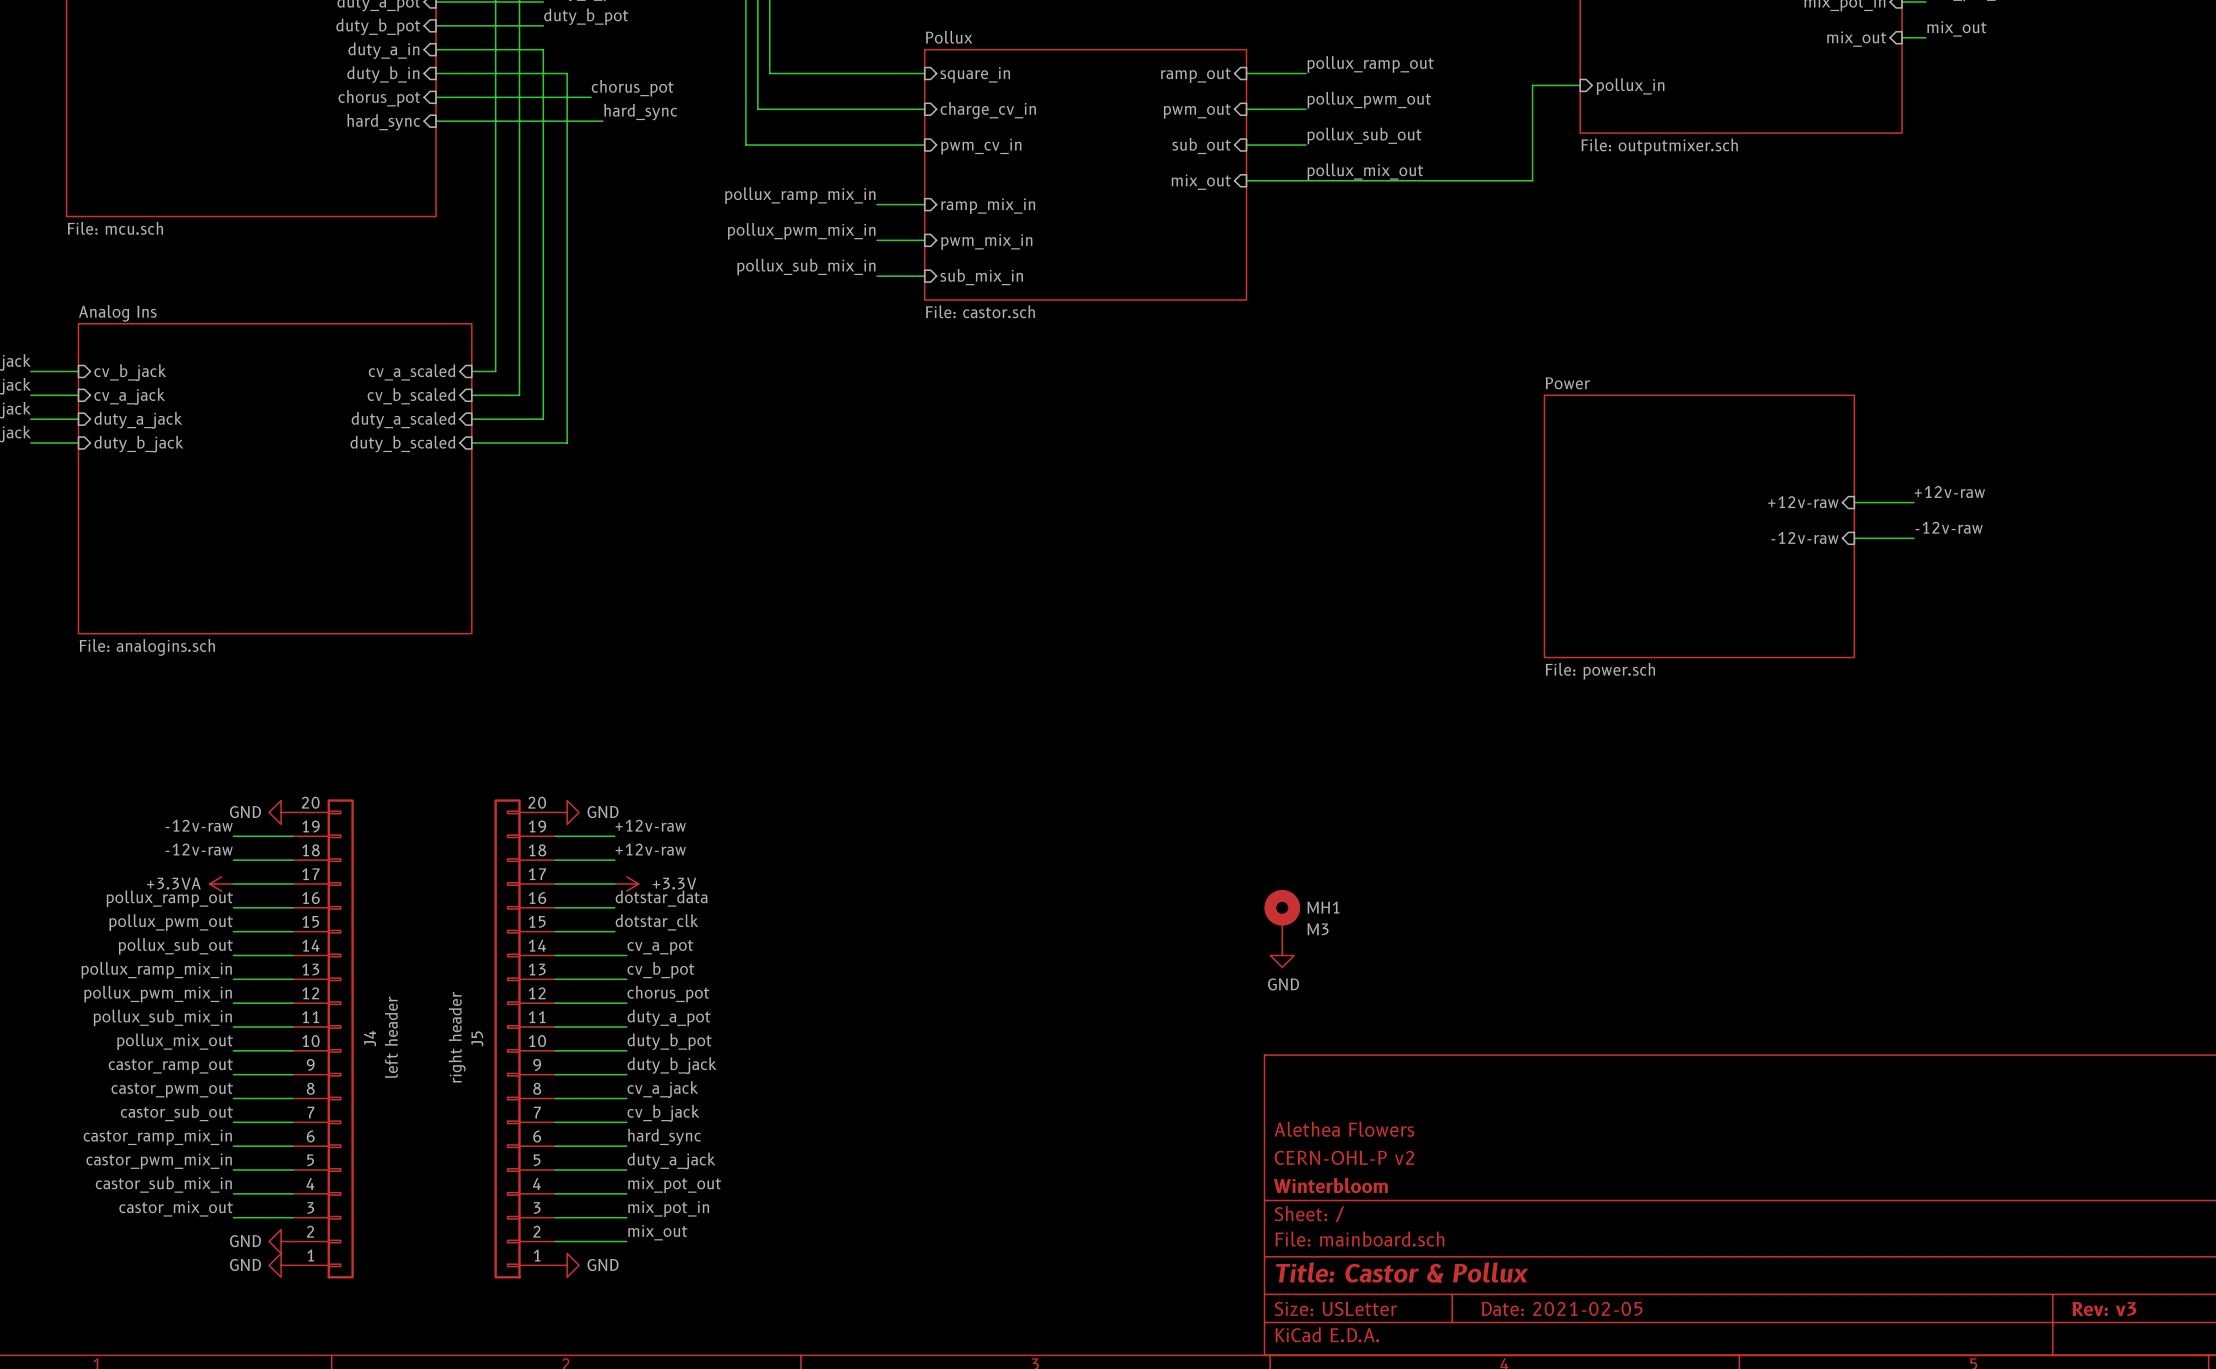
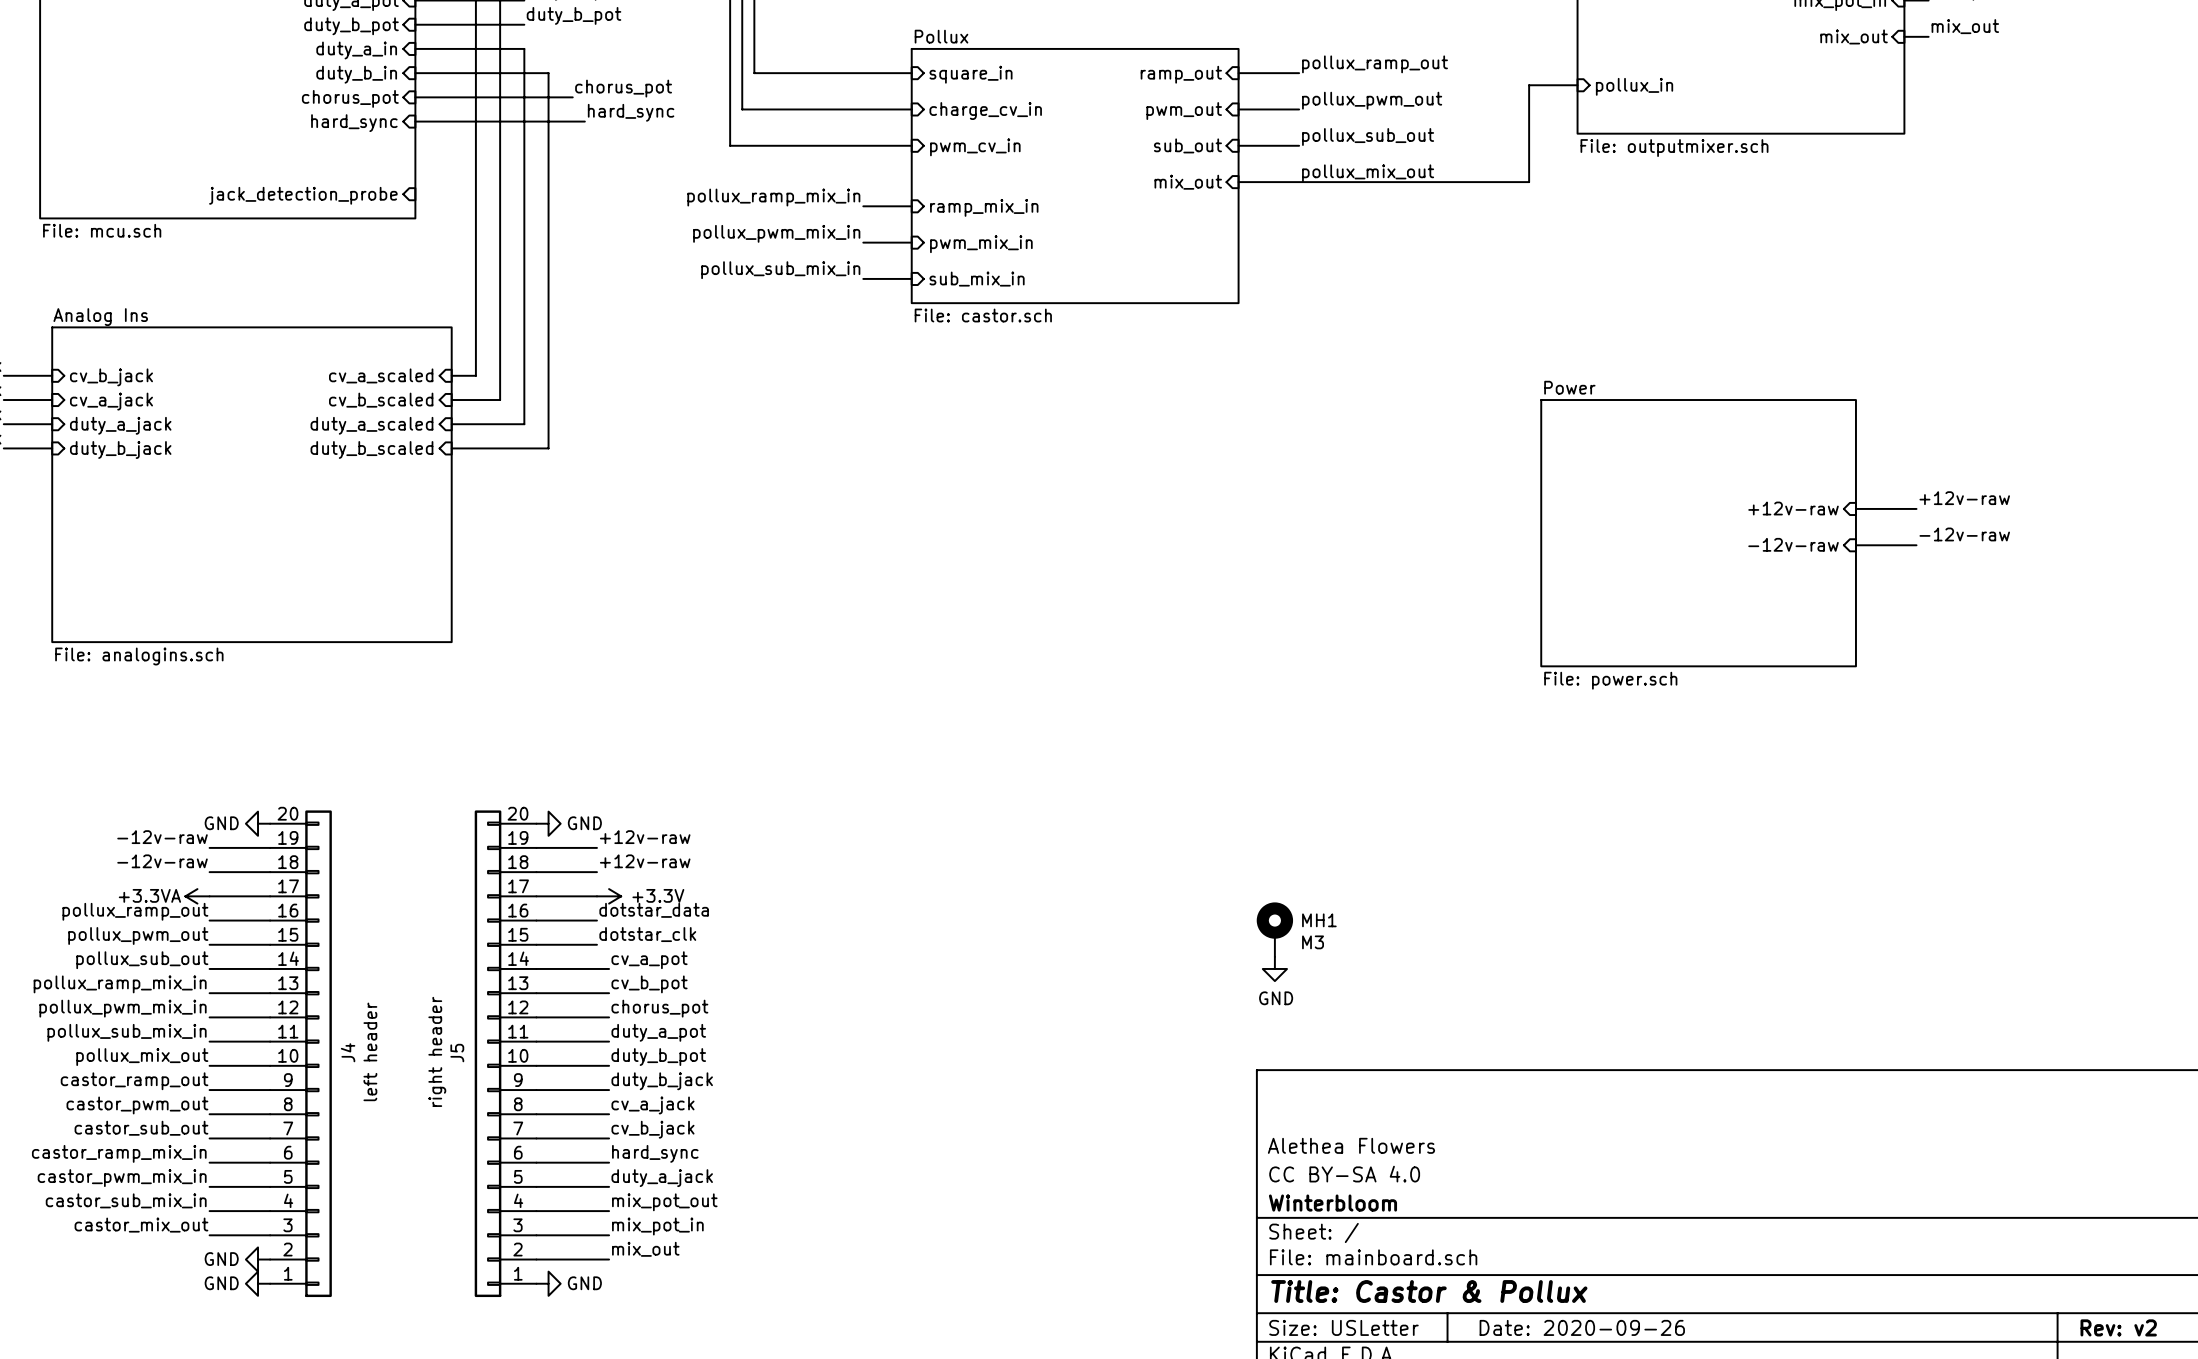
sheet pin: none -> jack_detection_probe (303, 195)
title block: CERN-OHL-P v2 (1344, 1157) -> CC BY-SA 4.0 (1344, 1174)
title block: Date: 2021-02-05 (1562, 1308) -> Date: 2020-09-26 (1582, 1327)
title block: Rev: v3 (2104, 1309) -> Rev: v2 (2118, 1327)

